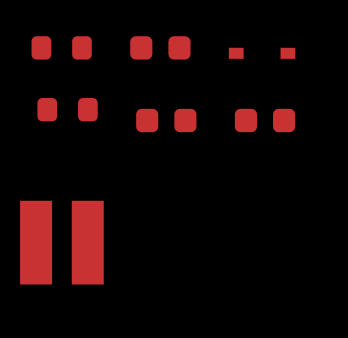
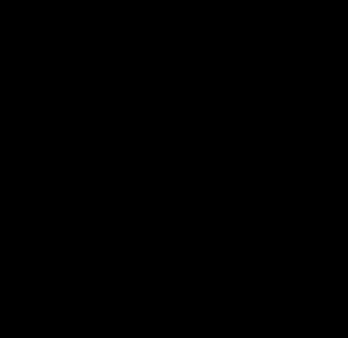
part: (61, 47) -> none
part: (160, 47) -> none
part: (262, 53) -> none
part: (67, 109) -> none
part: (166, 120) -> none
part: (265, 120) -> none
part: (61, 242) -> none

